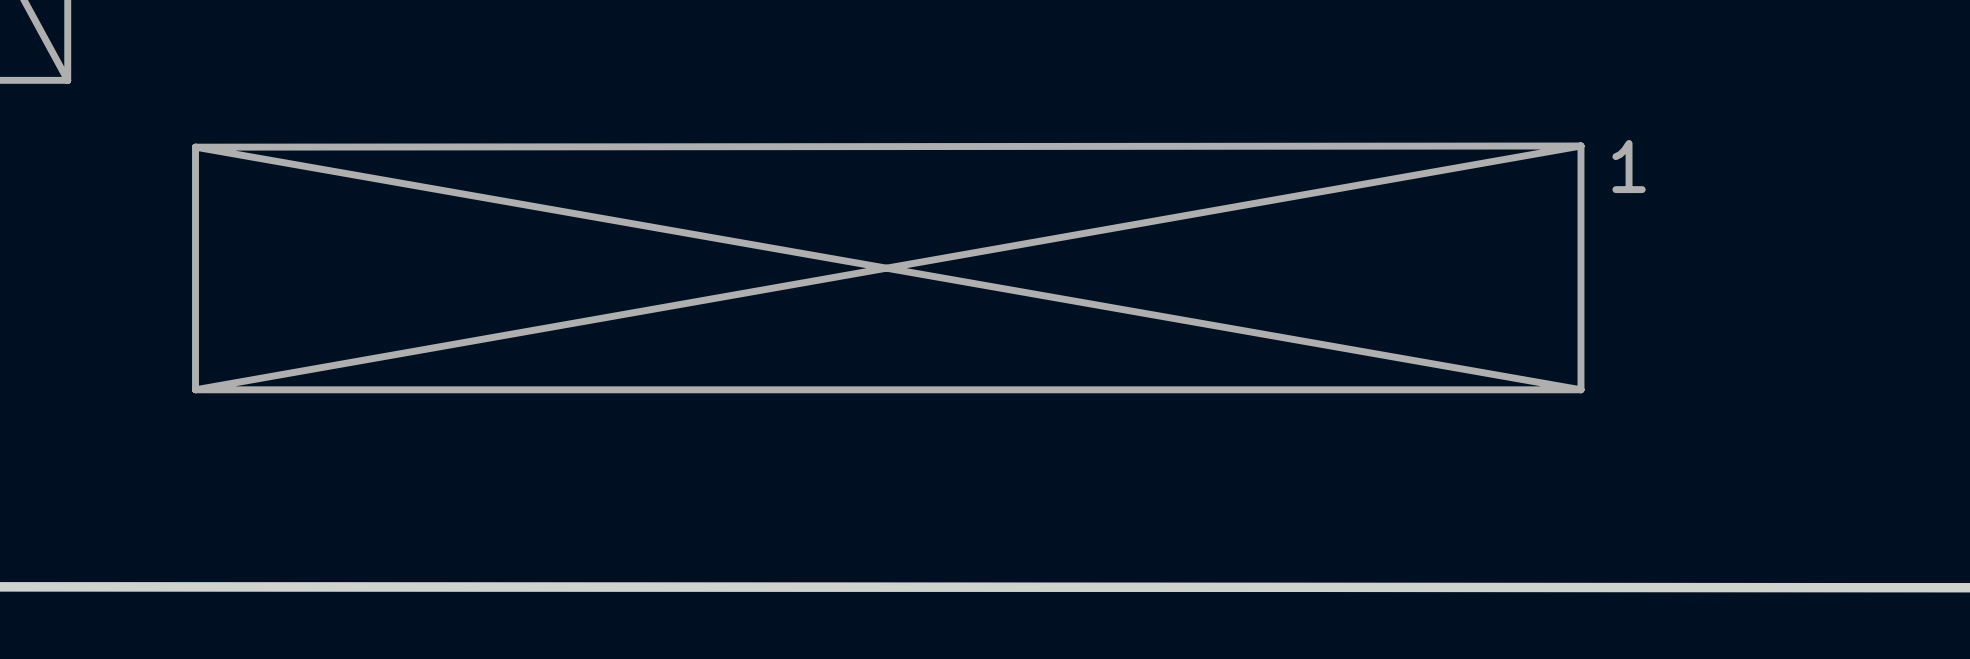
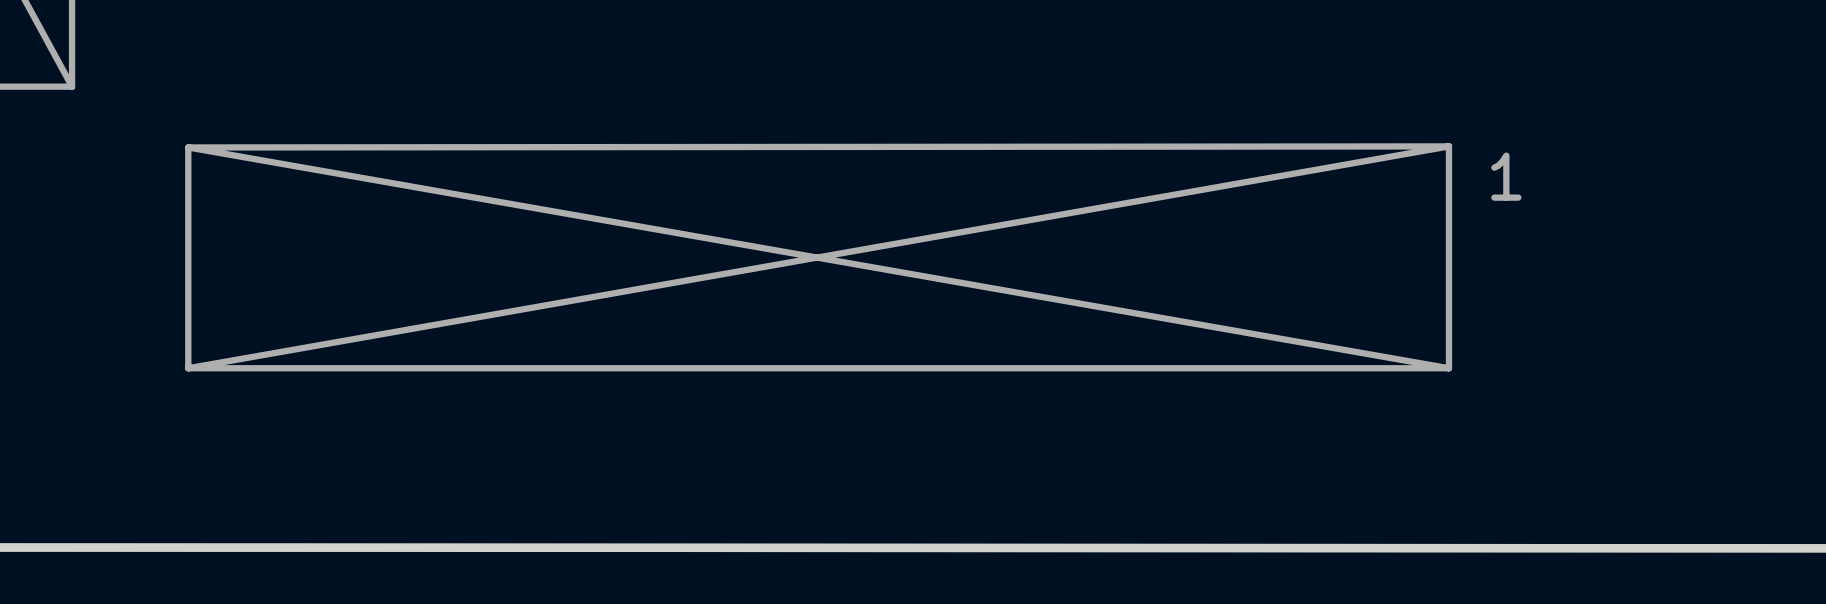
text position: 1 (1629, 166) -> 1 (1506, 176)

